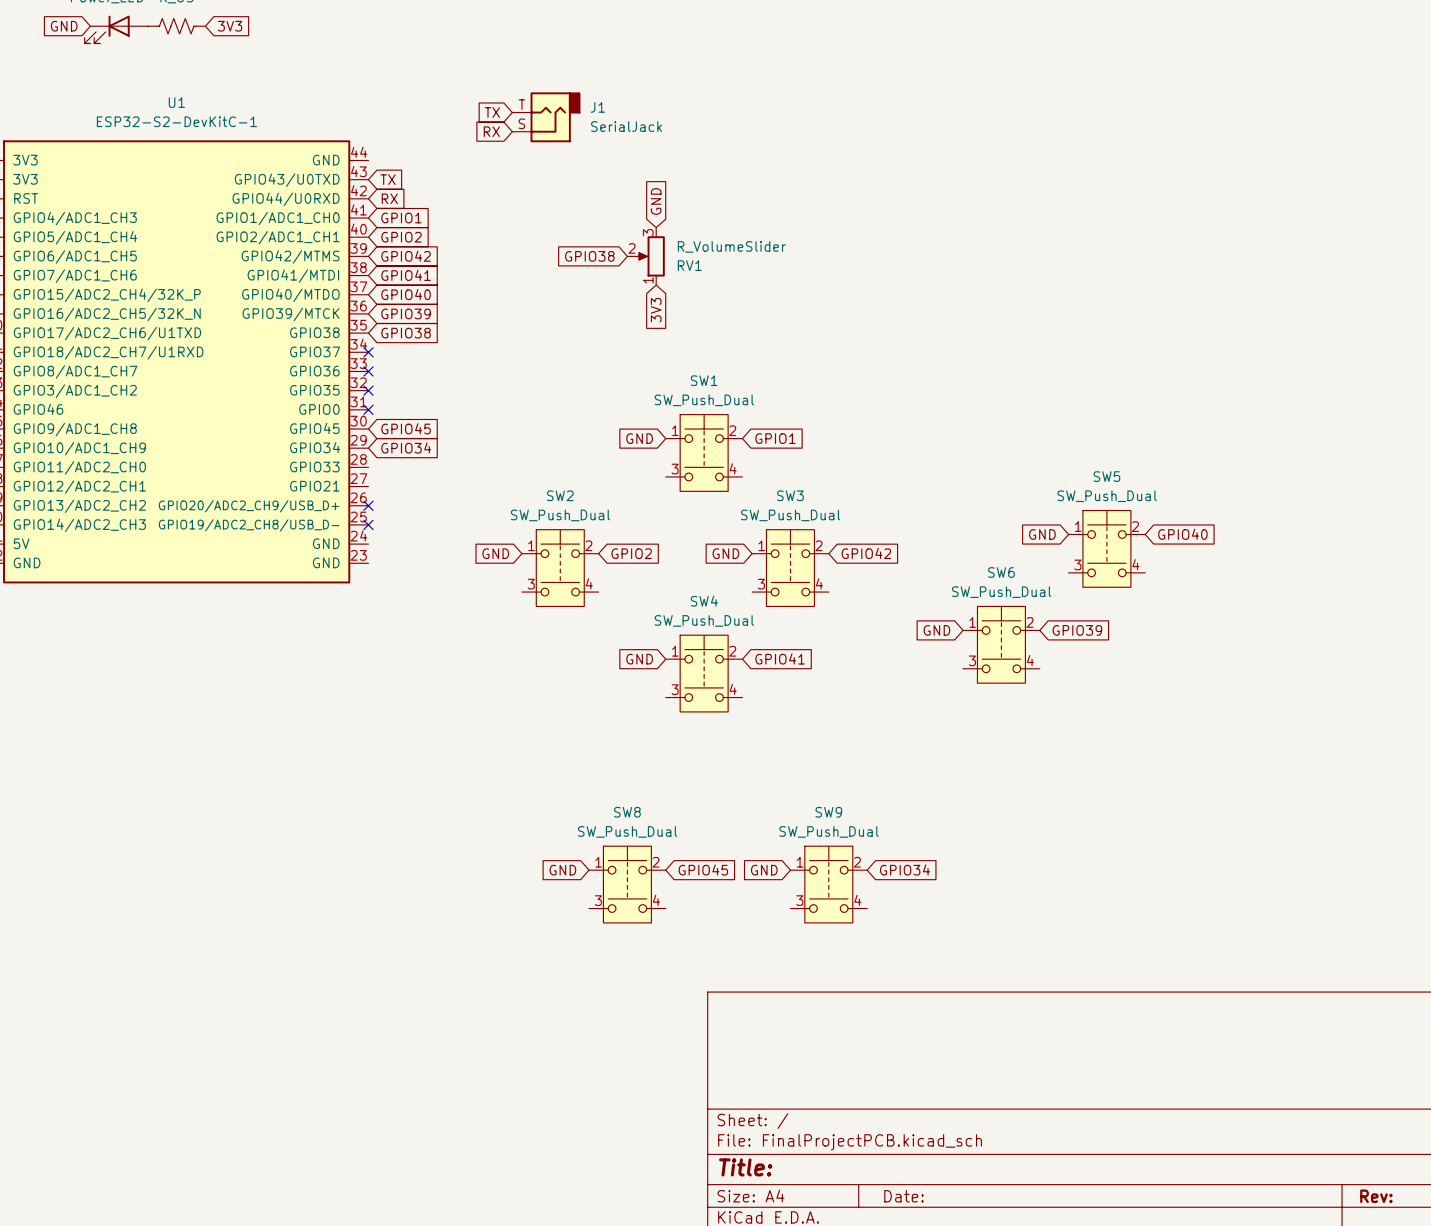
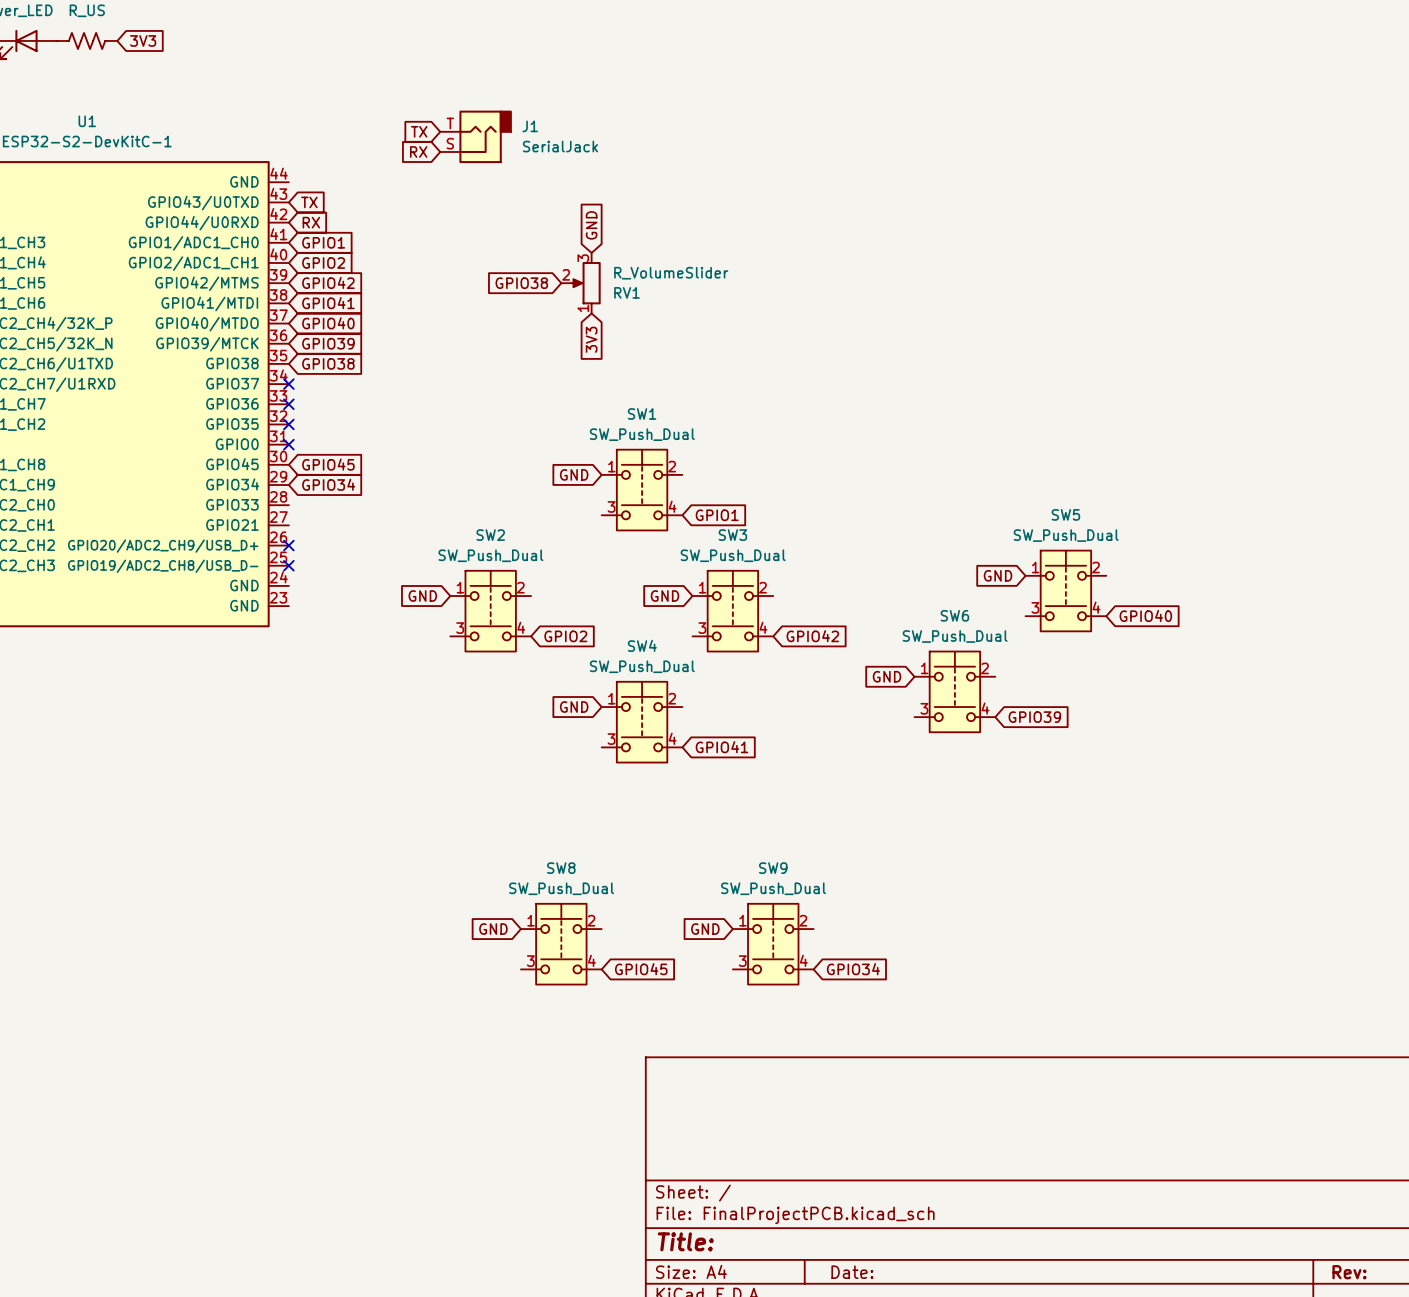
global label position: GPIO1 (775, 438) -> GPIO1 (717, 515)
global label position: GPIO40 (1182, 534) -> GPIO40 (1145, 615)
global label position: GPIO2 (631, 553) -> GPIO2 (565, 636)
global label position: GPIO42 (866, 553) -> GPIO42 (812, 636)
global label position: GPIO39 (1077, 630) -> GPIO39 (1034, 717)
global label position: GPIO41 (780, 658) -> GPIO41 (721, 747)
global label position: GPIO45 (703, 869) -> GPIO45 (641, 969)
global label position: GPIO34 (904, 869) -> GPIO34 (853, 969)

